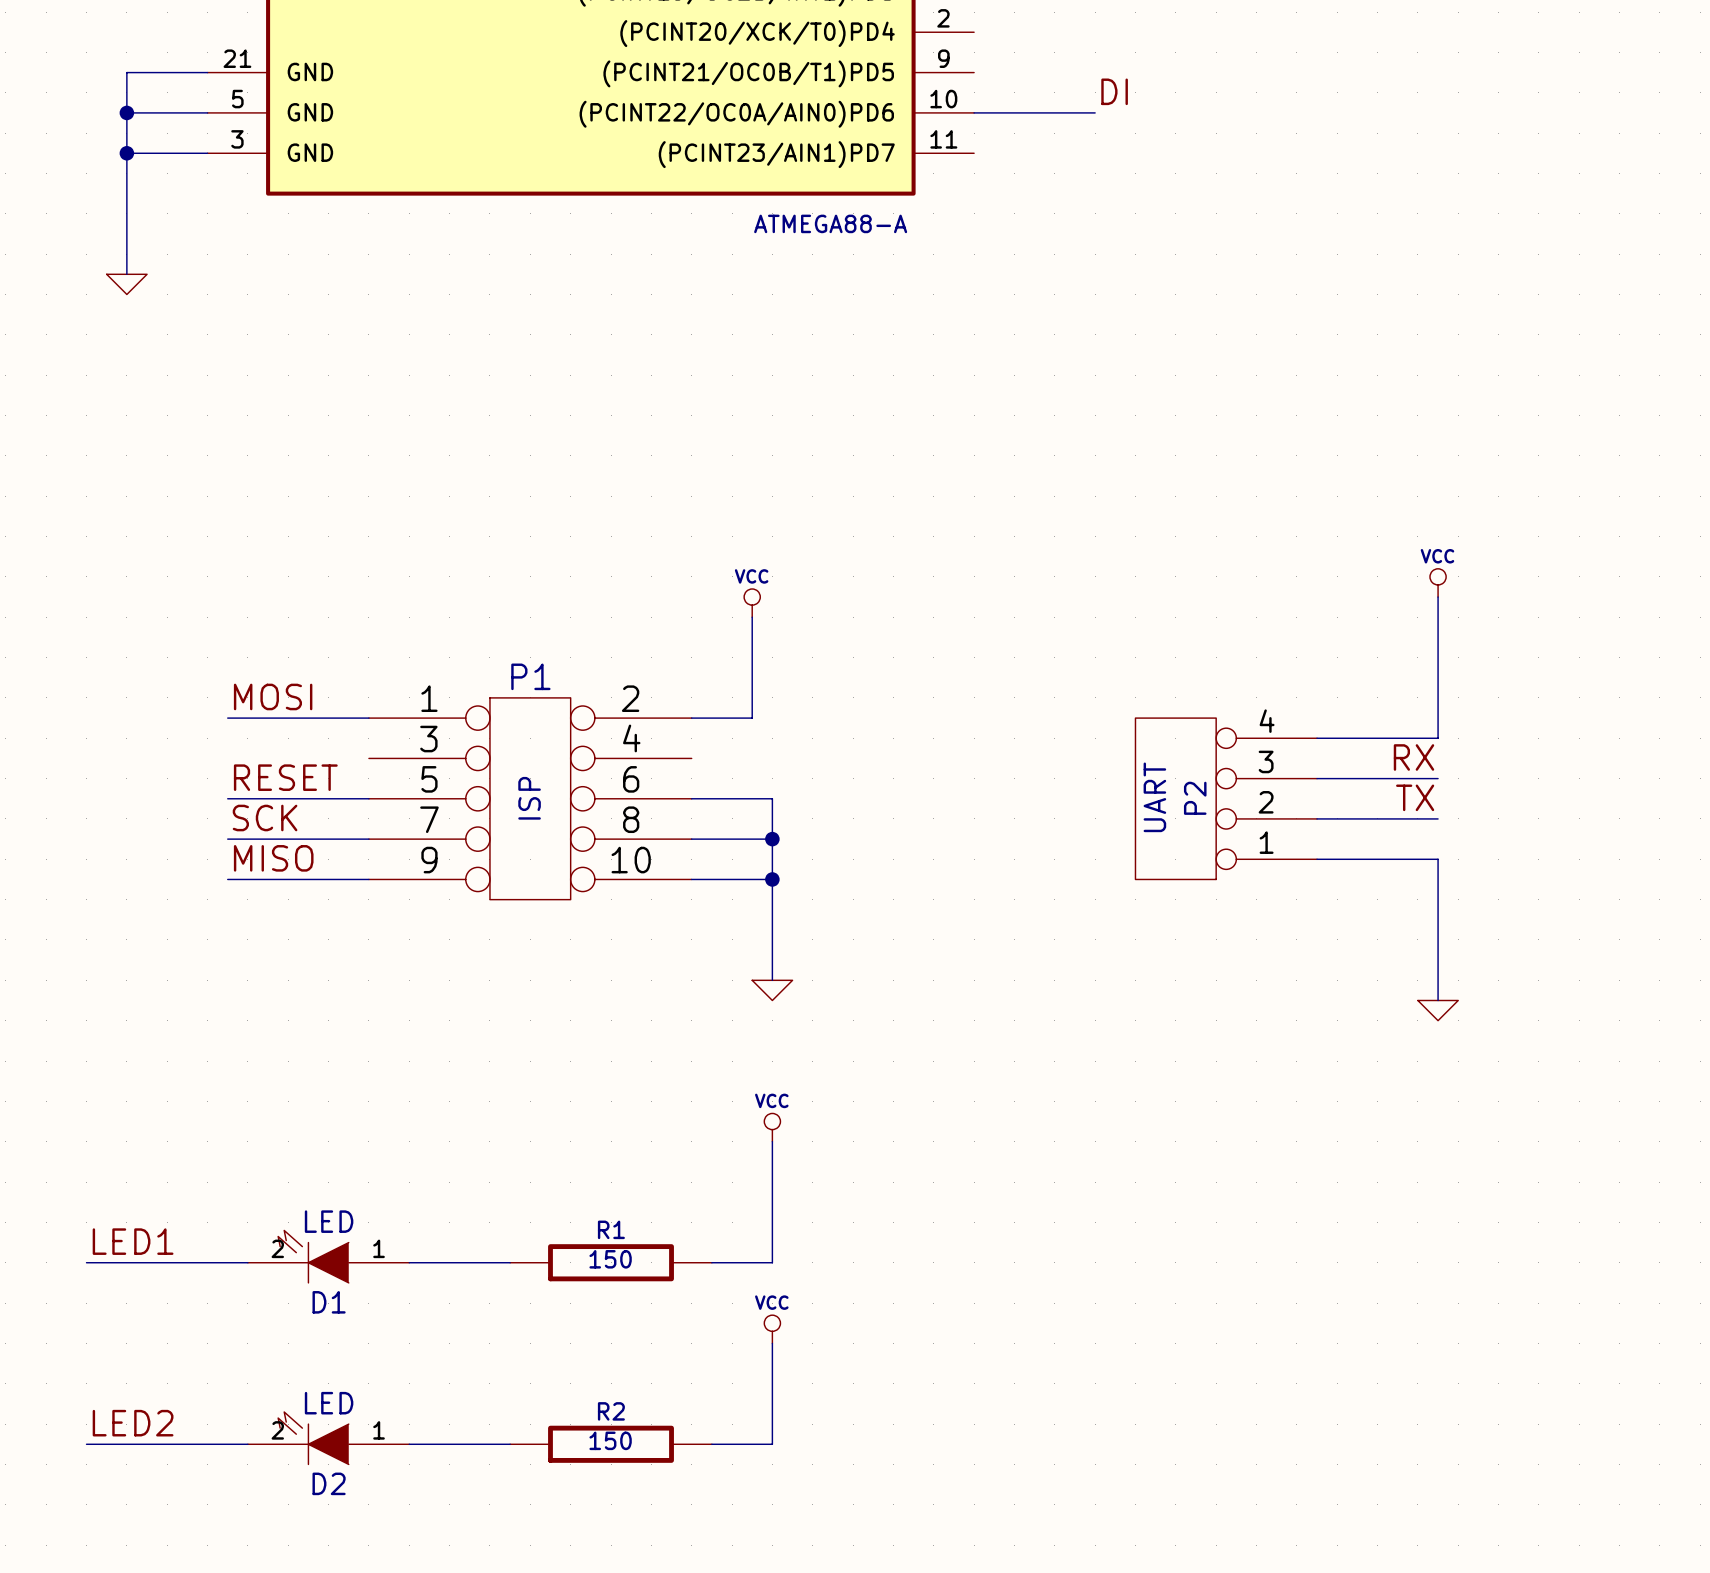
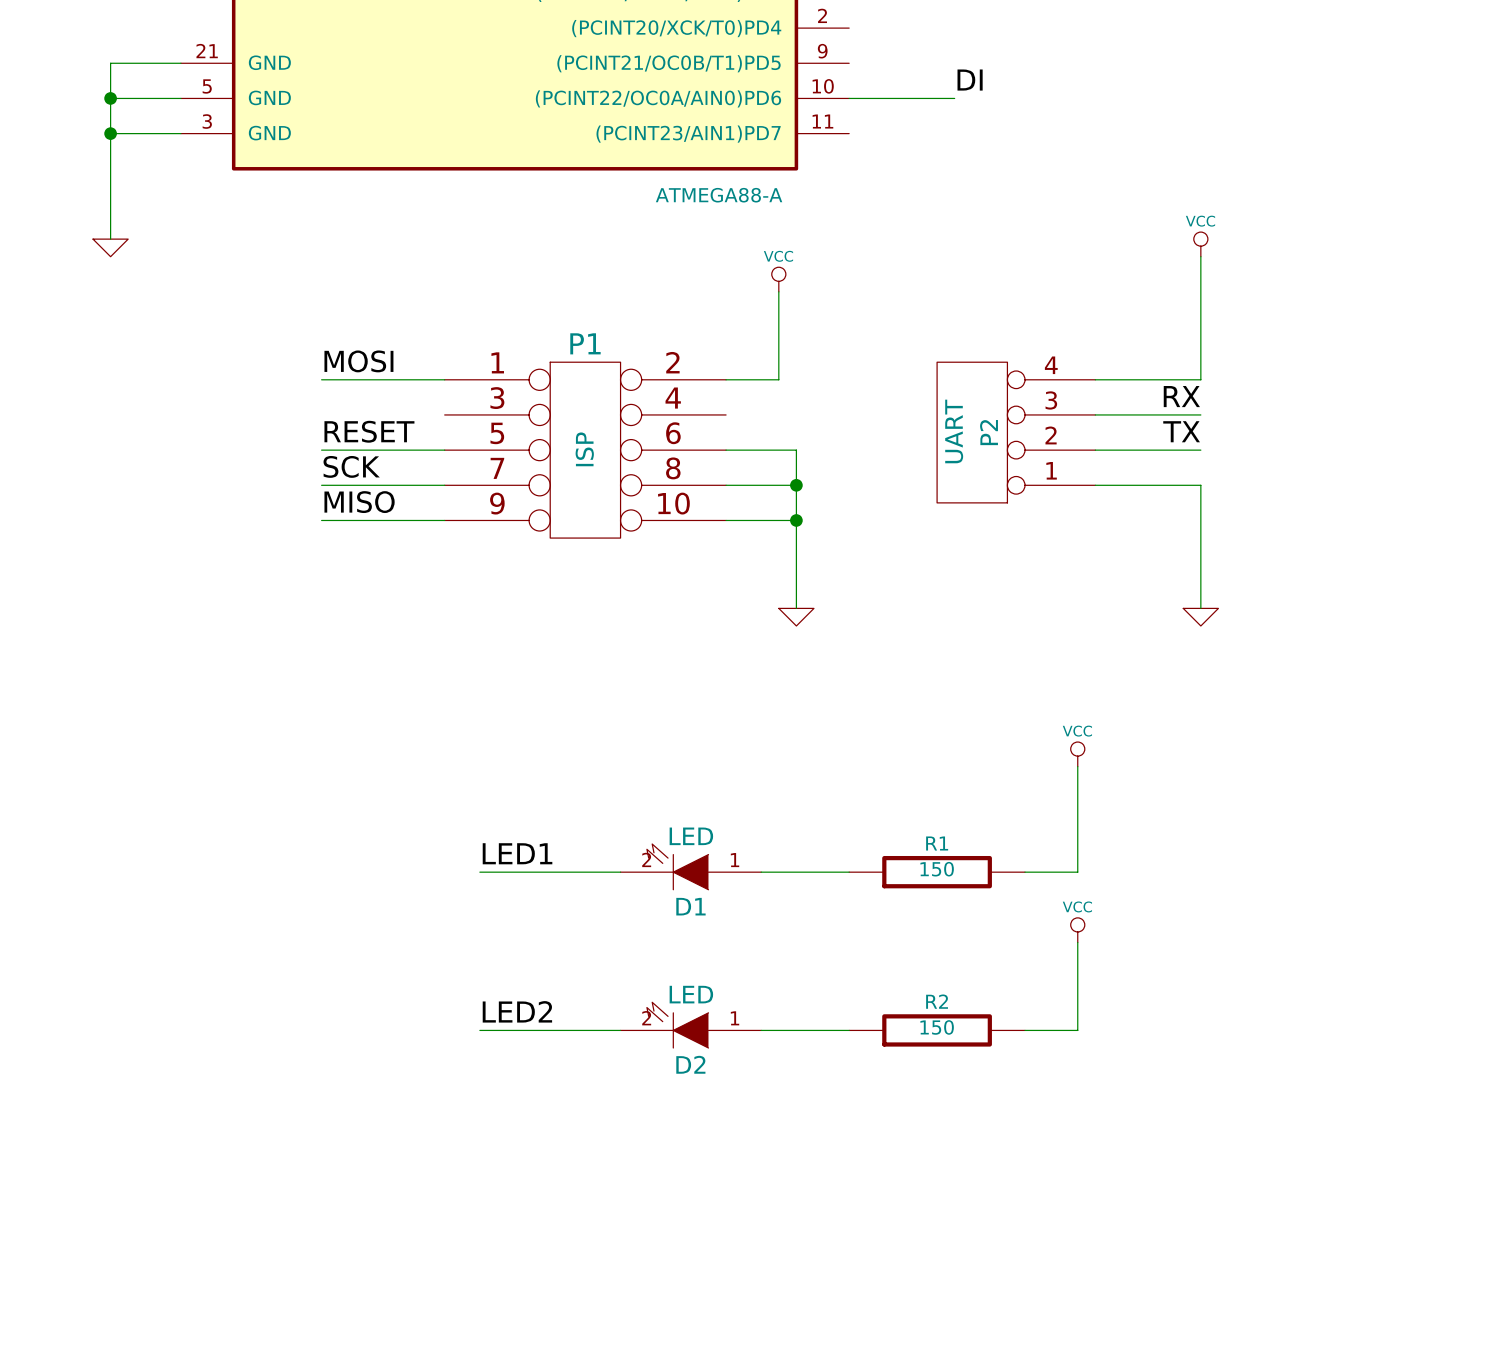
power symbol: none -> VCC (1200, 244)
power symbol: none -> VCC (778, 279)
junction: none -> (796, 485)
power symbol: VCC (1438, 582) -> none
junction: none -> (796, 520)
wire: (1438, 597) (1438, 738) (1317, 738) -> (1200, 256) (1200, 379) (1095, 379)
power symbol: VCC (752, 603) -> none
wire: (752, 617) (752, 718) (691, 718) -> (778, 291) (778, 379) (726, 379)
label position: MOSI (273, 696) -> MOSI (358, 361)
power symbol: none -> (796, 617)
power symbol: none -> (1200, 617)
wire: (227, 718) (368, 718) -> (321, 379) (444, 379)
label position: RX (1413, 757) -> RX (1181, 396)
label position: RESET (285, 777) -> RESET (369, 431)
wire: (1317, 778) (1438, 778) -> (1095, 414) (1200, 414)
label position: TX (1415, 797) -> TX (1181, 431)
wire: (227, 798) (368, 798) -> (321, 450) (444, 450)
P1 position: (530, 798) -> (585, 450)
wire: (691, 798) (772, 798) (772, 980) -> (726, 450) (796, 450) (796, 608)
P2 position: (1226, 798) -> (1016, 432)
label position: SCK (265, 818) -> SCK (351, 466)
wire: (1317, 818) (1438, 818) -> (1095, 450) (1200, 450)
wire: (227, 839) (368, 839) -> (321, 485) (444, 485)
wire: (691, 839) (772, 839) -> (726, 485) (796, 485)
junction: (772, 839) -> none
label position: MISO (273, 858) -> MISO (359, 502)
wire: (1317, 859) (1438, 859) (1438, 1000) -> (1095, 485) (1200, 485) (1200, 608)
power symbol: none -> VCC (1077, 754)
wire: (227, 879) (368, 879) -> (321, 520) (444, 520)
wire: (691, 879) (772, 879) -> (726, 520) (796, 520)
junction: (772, 879) -> none
wire: none -> (1077, 766) (1077, 872) (1025, 872)
label: none -> LED1 (517, 853)
power symbol: (772, 990) -> none
wire: none -> (479, 872) (620, 872)
wire: none -> (761, 872) (849, 872)
power symbol: (1438, 1010) -> none
power symbol: none -> VCC (1077, 930)
wire: none -> (1077, 942) (1077, 1030) (1025, 1030)
power symbol: VCC (772, 1127) -> none
wire: (772, 1141) (772, 1262) (711, 1262) -> none
label: none -> LED2 (517, 1011)
wire: none -> (479, 1030) (620, 1030)
wire: none -> (761, 1030) (849, 1030)
label: LED1 (133, 1241) -> none
D1 position: (328, 1256) -> (690, 866)
wire: (86, 1262) (247, 1262) -> none
wire: (409, 1262) (510, 1262) -> none
R1 position: (611, 1262) -> (937, 872)
power symbol: VCC (772, 1329) -> none
wire: (772, 1343) (772, 1444) (711, 1444) -> none
label: LED2 (133, 1423) -> none
D2 position: (328, 1438) -> (690, 1025)
wire: (86, 1444) (247, 1444) -> none
wire: (409, 1444) (510, 1444) -> none
R2 position: (611, 1444) -> (937, 1030)

